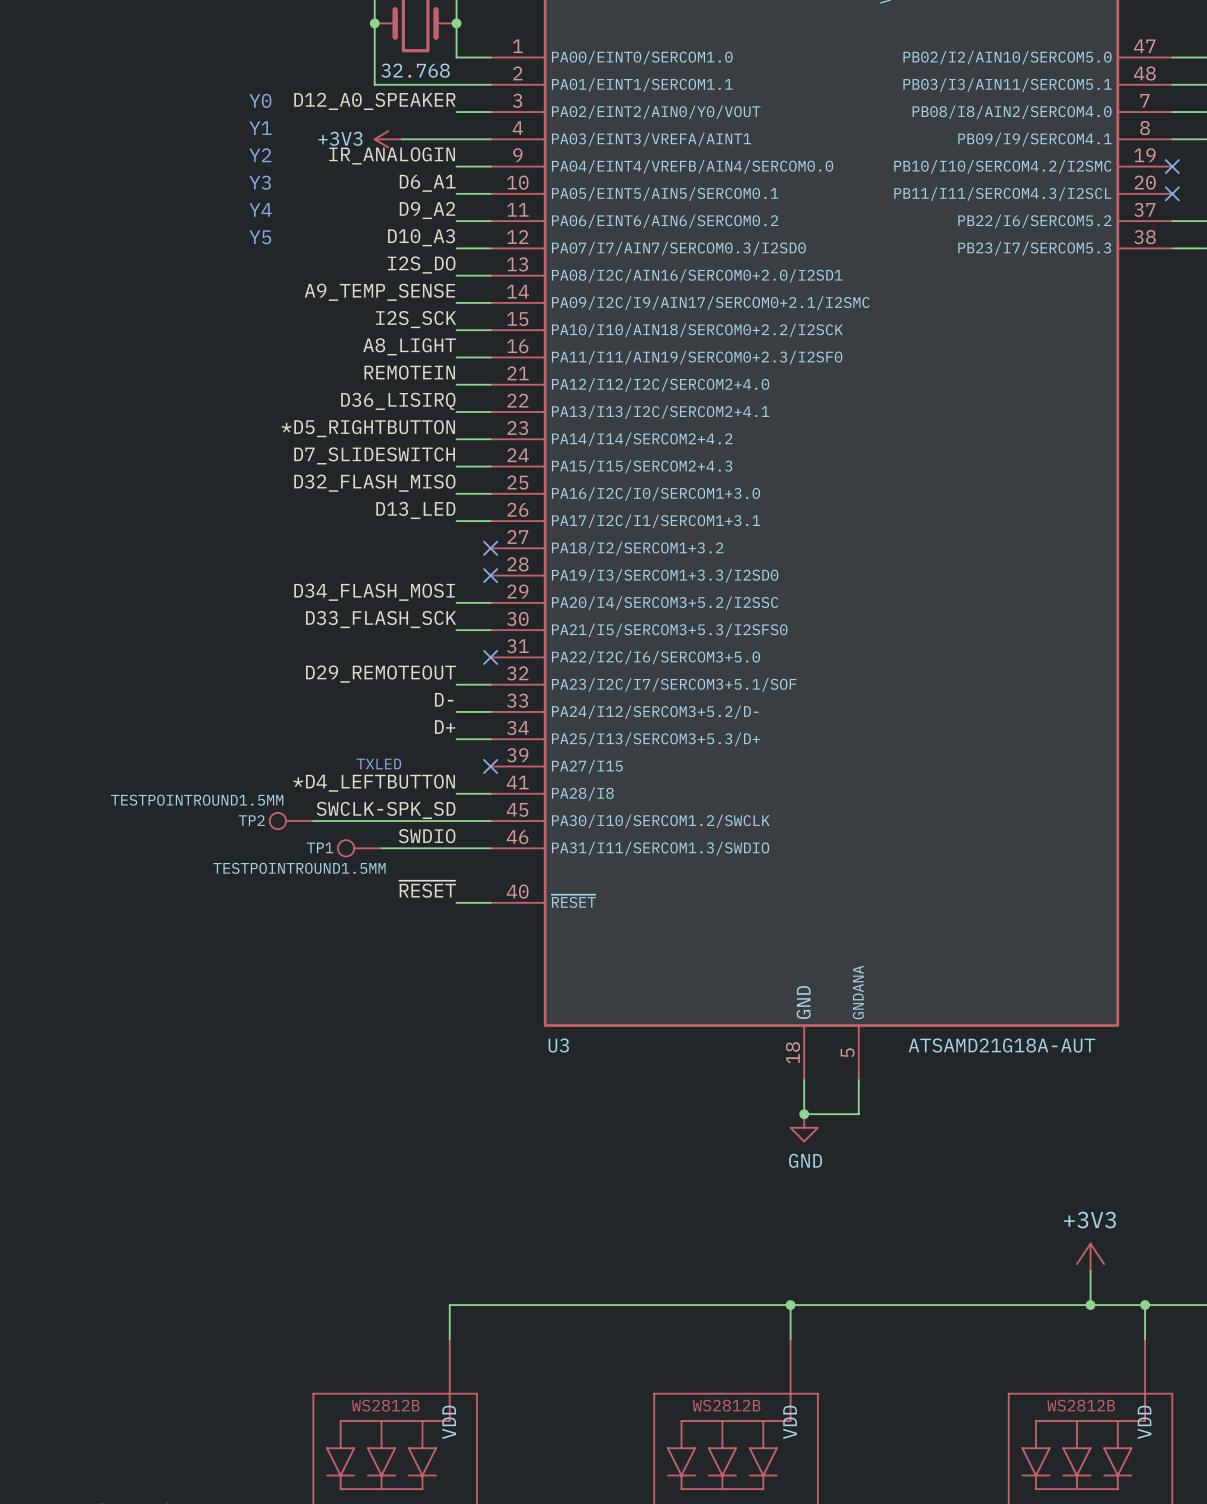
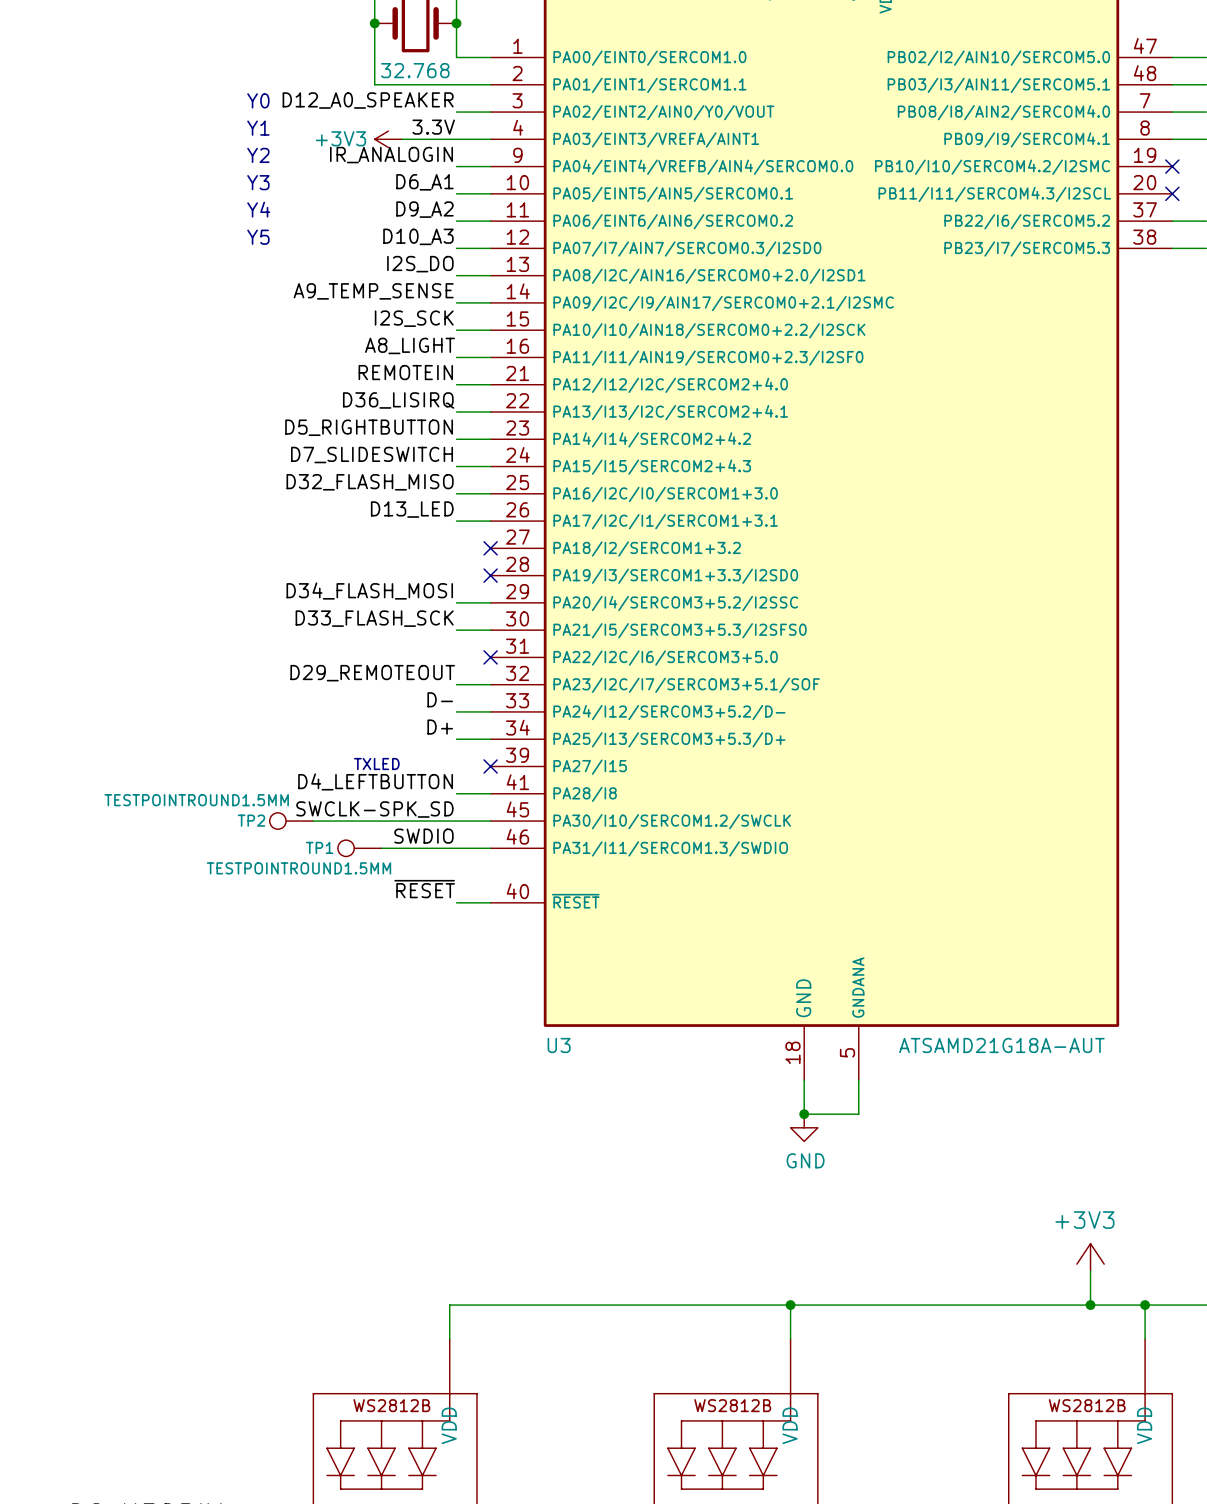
label: none -> 3.3V (433, 127)
label: *D5_RIGHTBUTTON (368, 428) -> D5_RIGHTBUTTON (369, 427)
label: *D4_LEFTBUTTON (374, 783) -> D4_LEFTBUTTON (375, 781)

